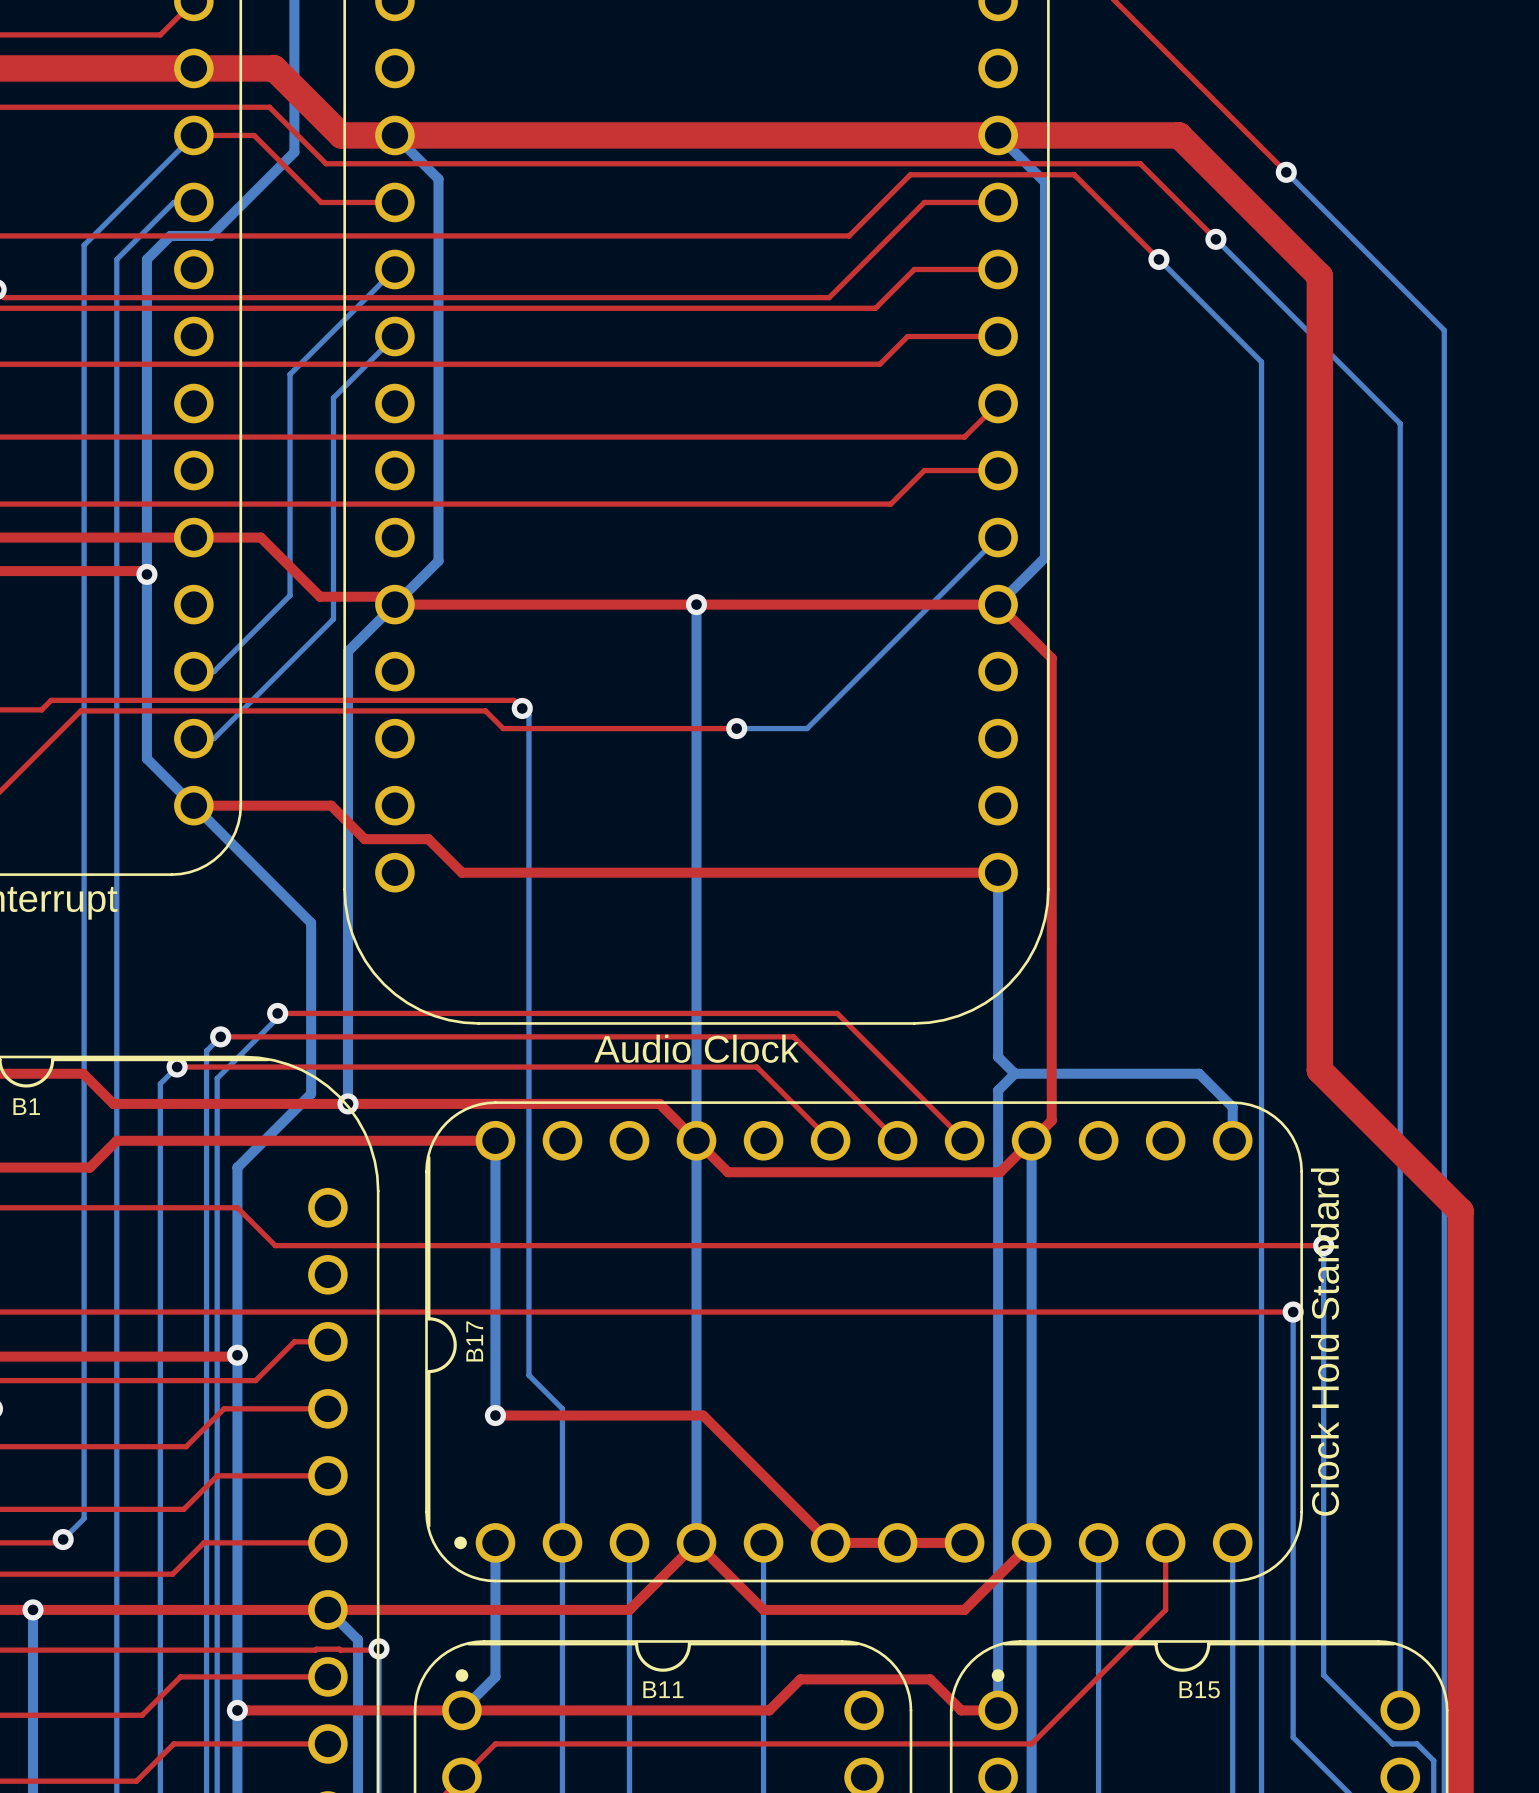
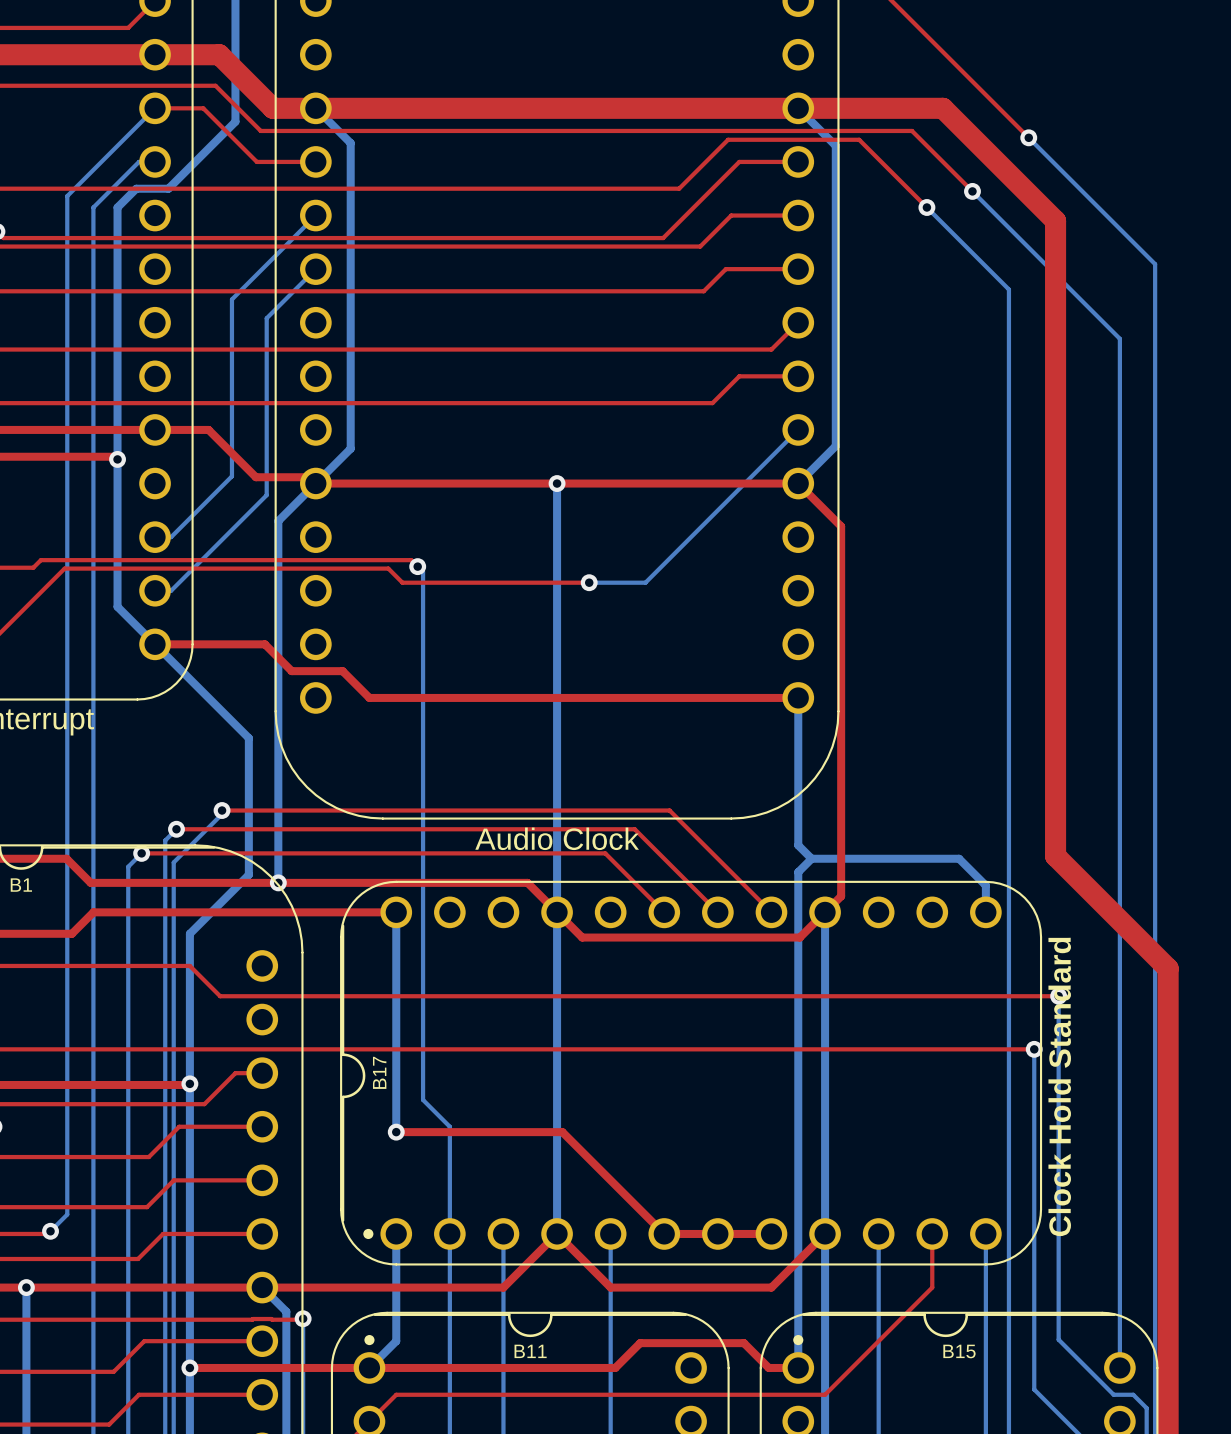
B17 footprint: [425, 1101, 1303, 1583] -> [340, 880, 1043, 1266]
B17 text: Clock Hold Standard (1325, 1342) -> none

